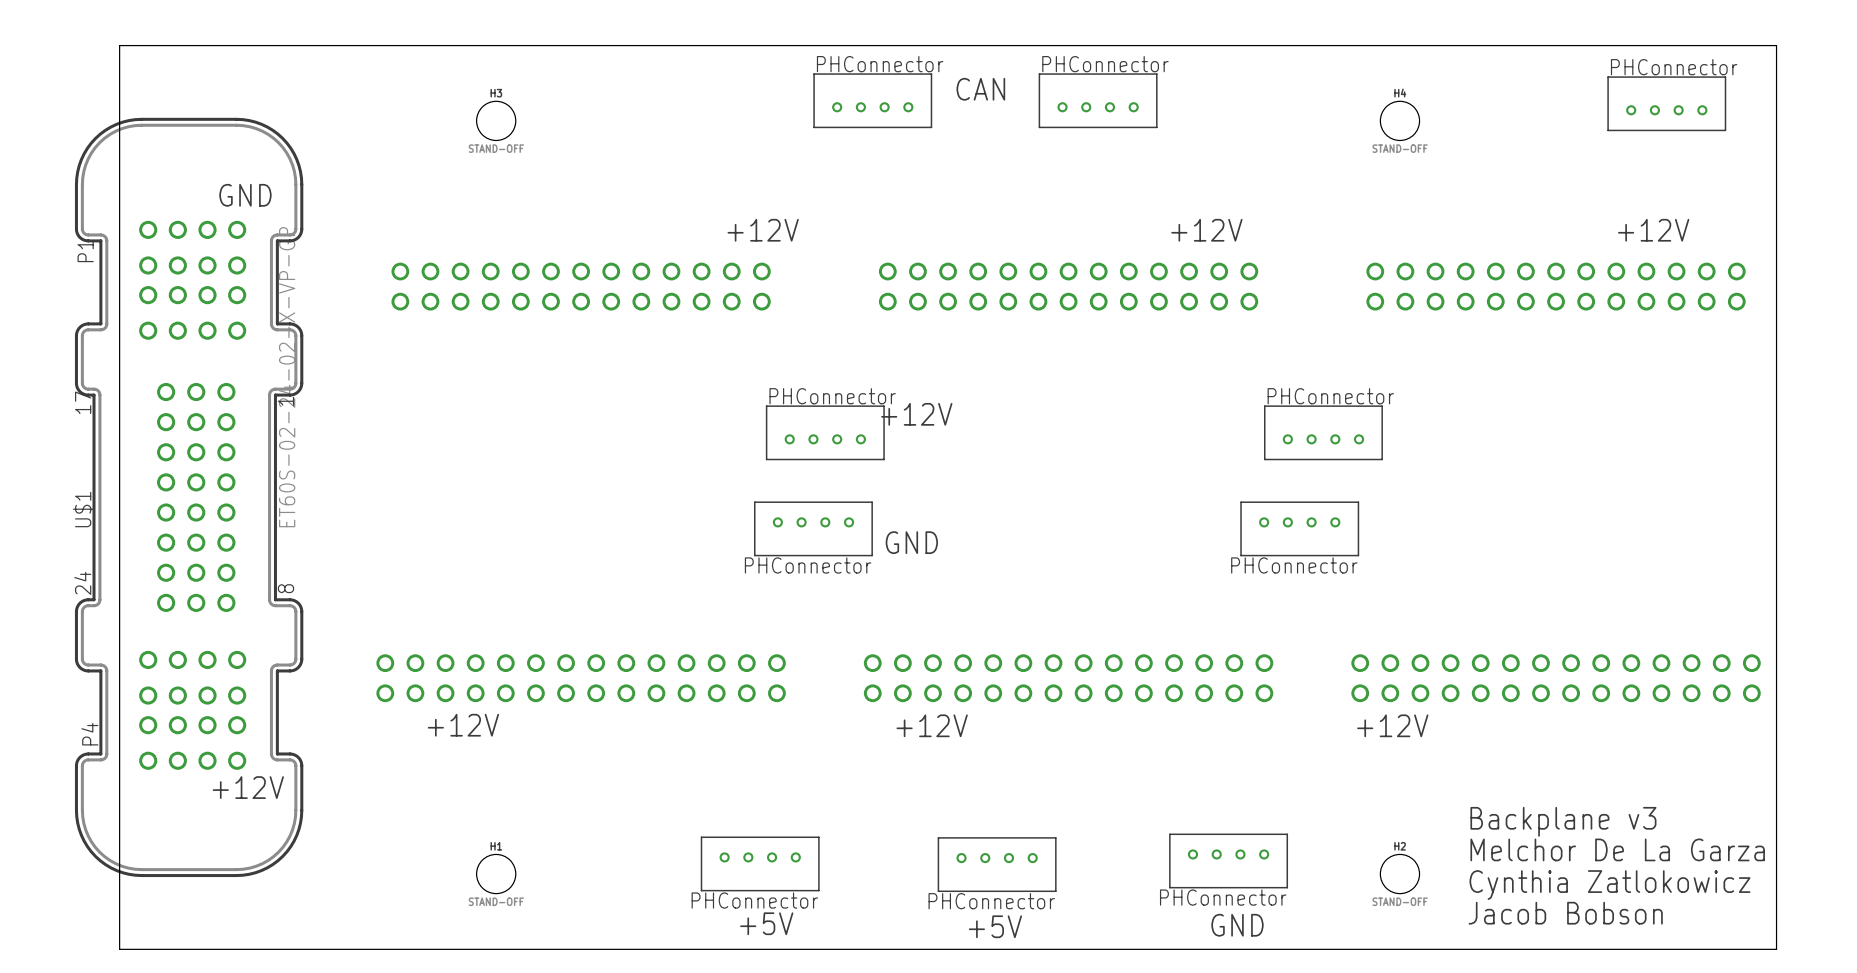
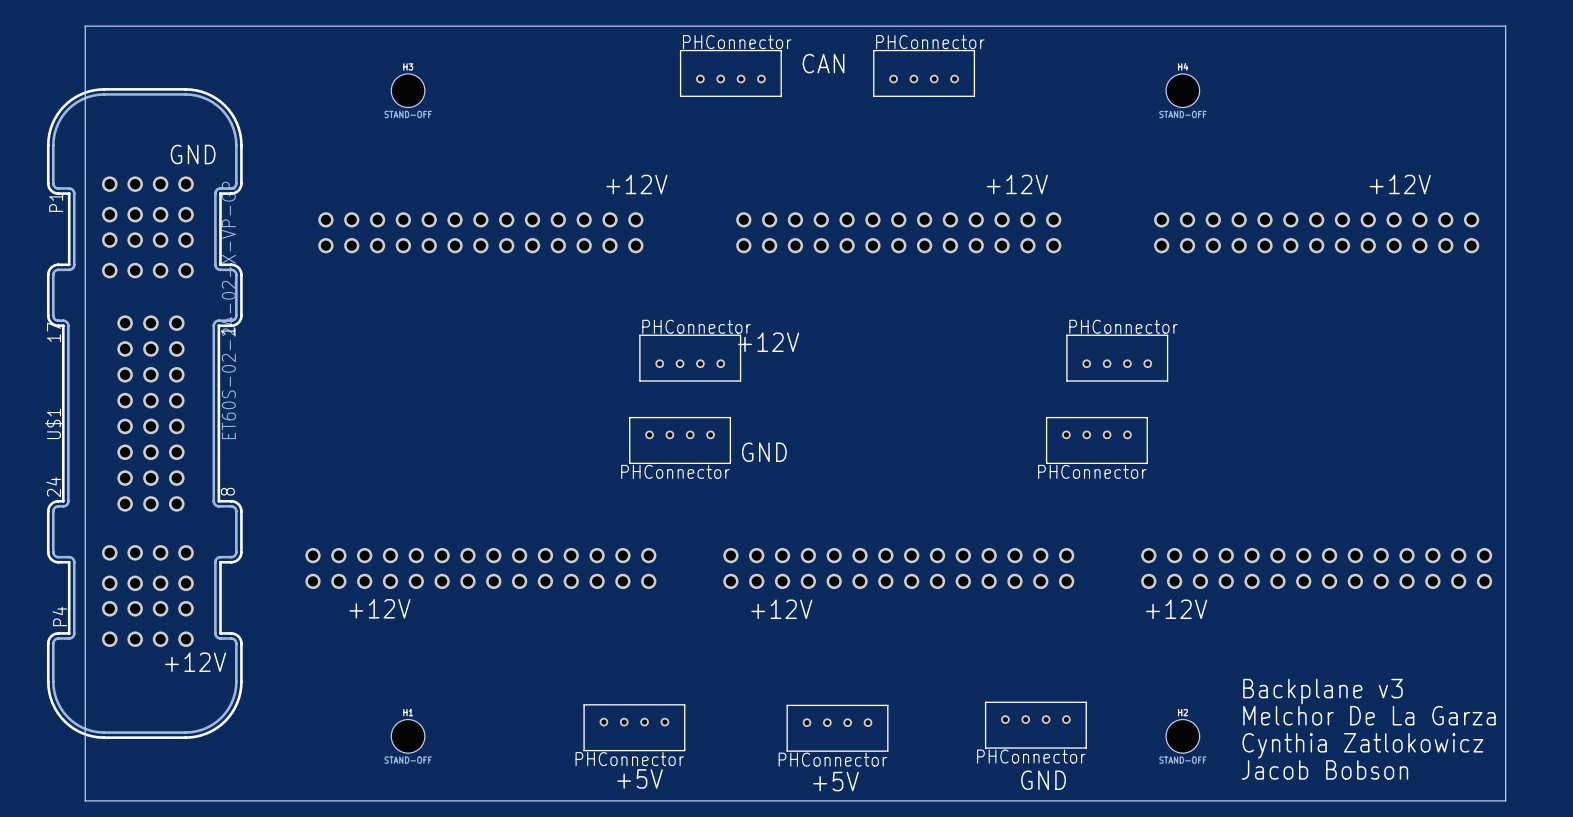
part: (1666, 103) -> none

